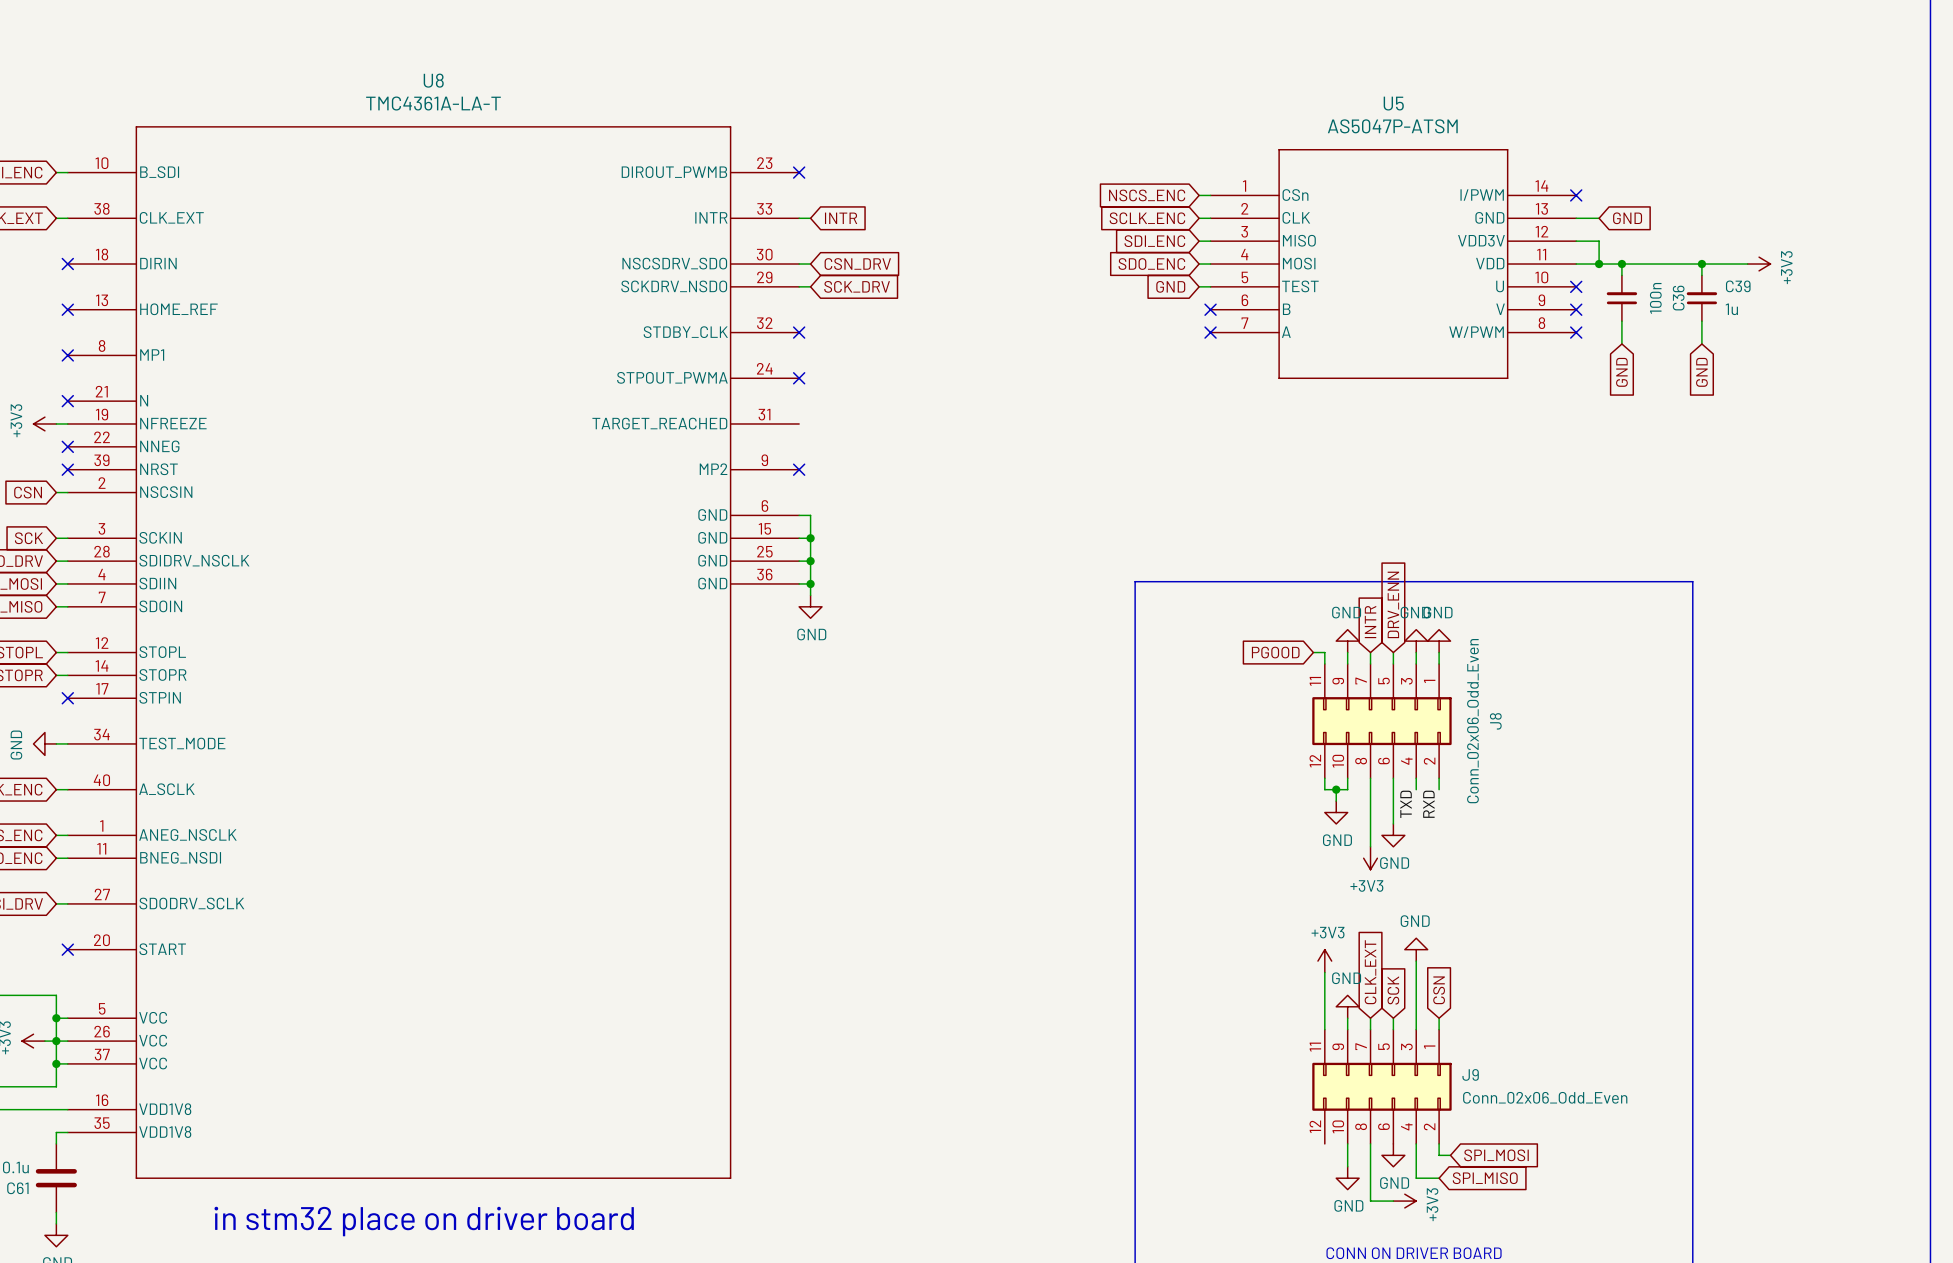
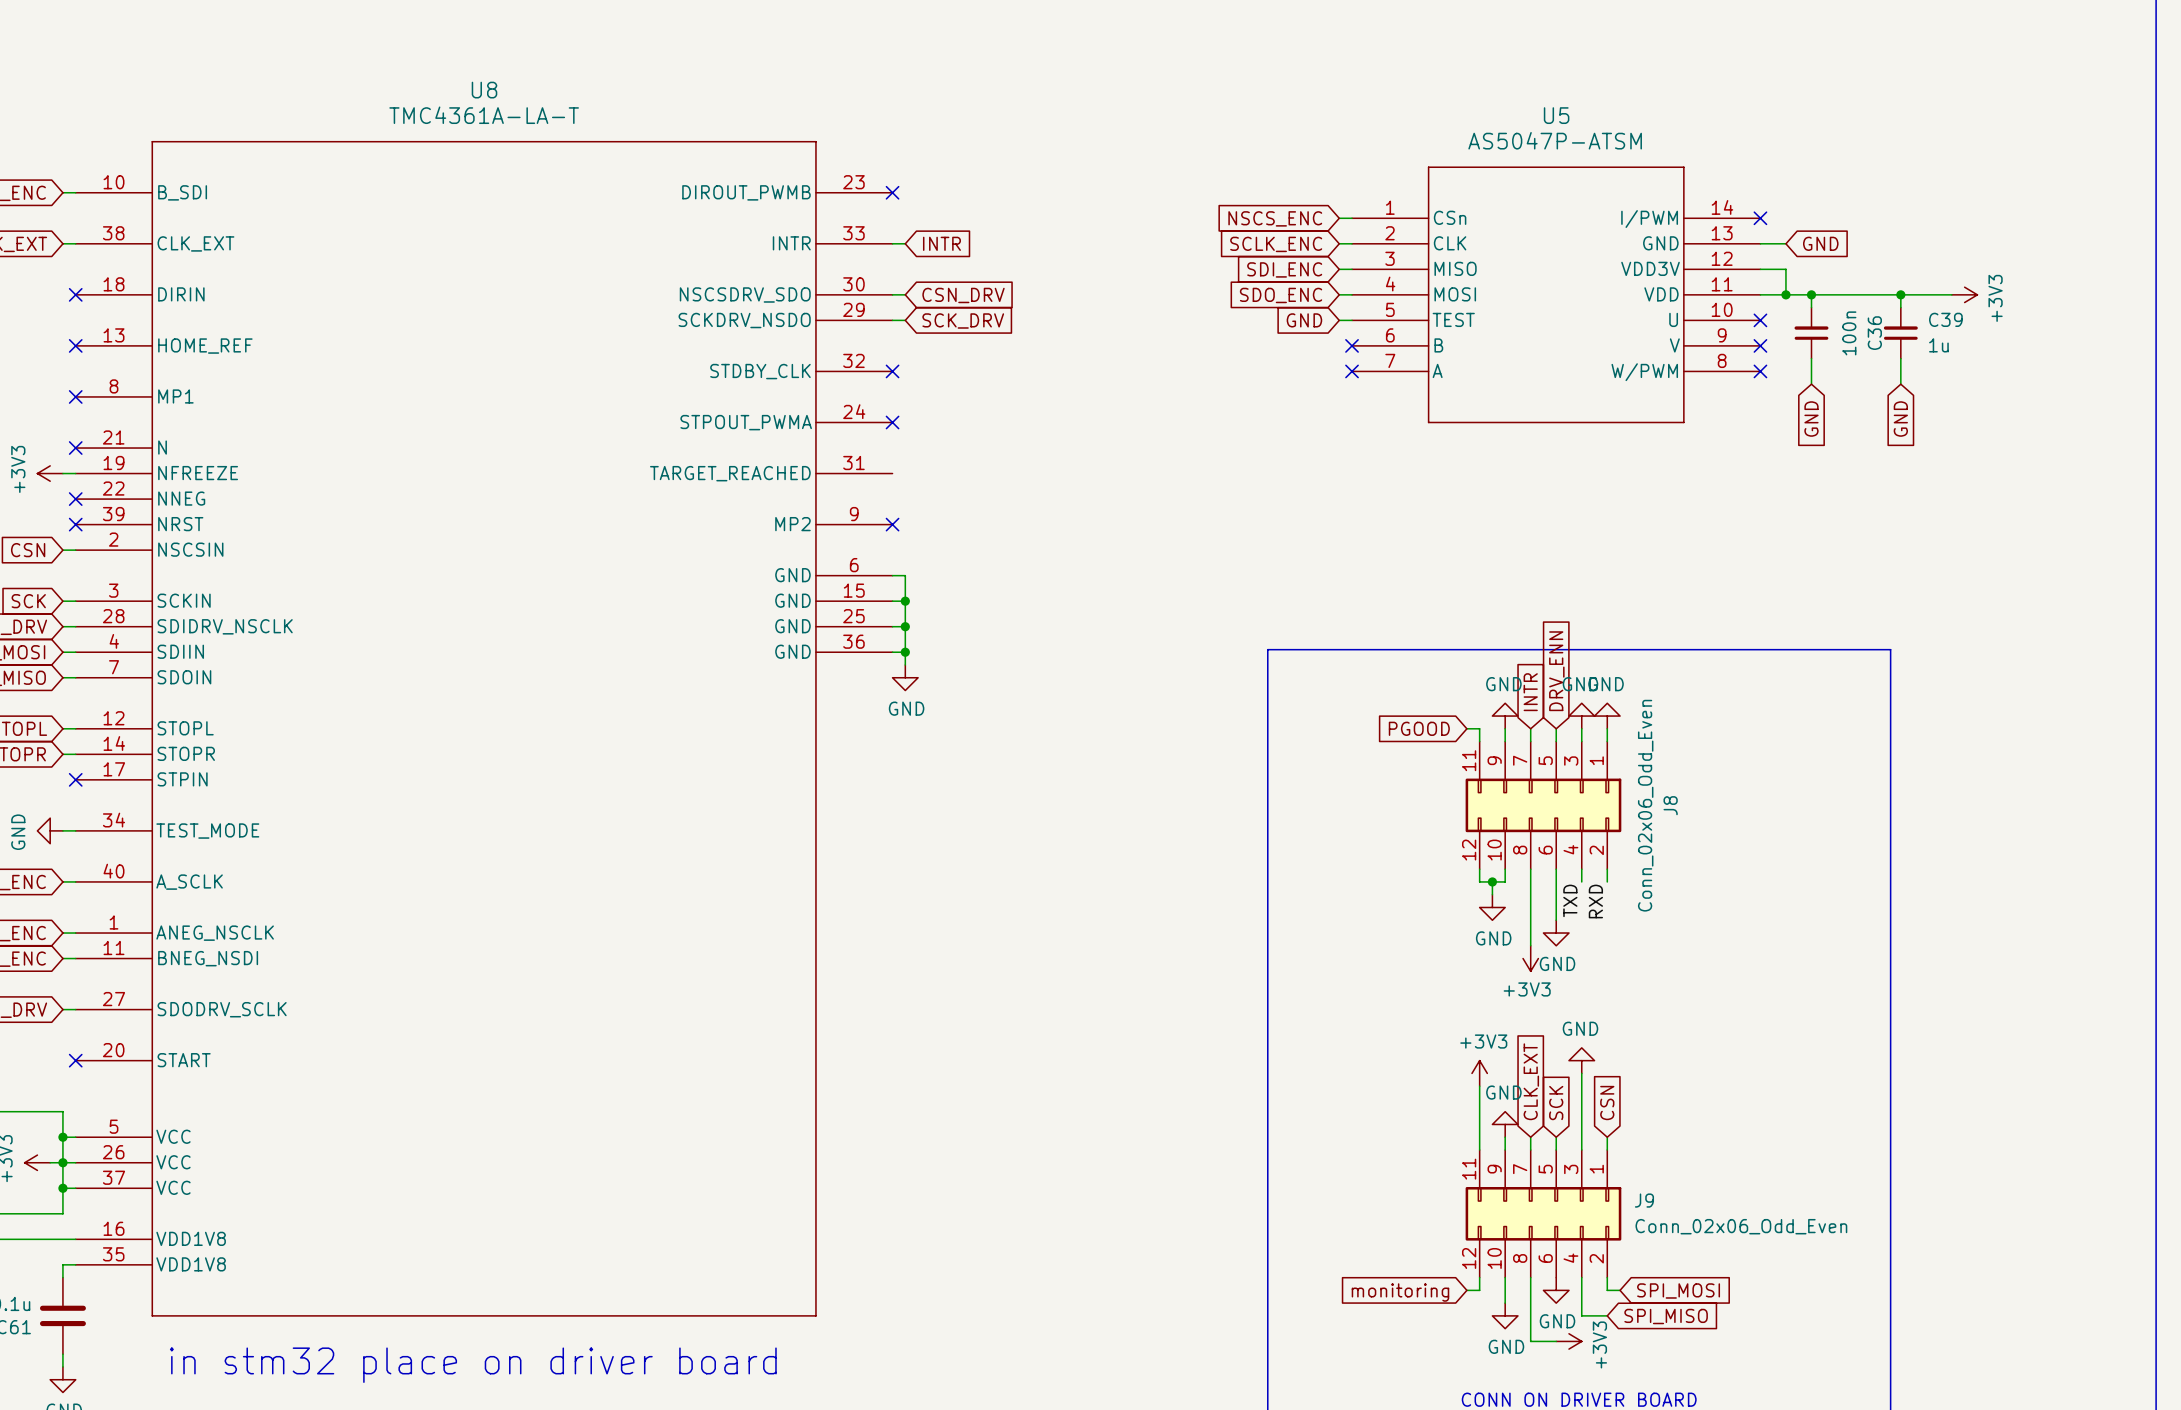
wire: none -> (1479, 1277) (1479, 1290) (1466, 1290)
global label: none -> monitoring (1400, 1292)

